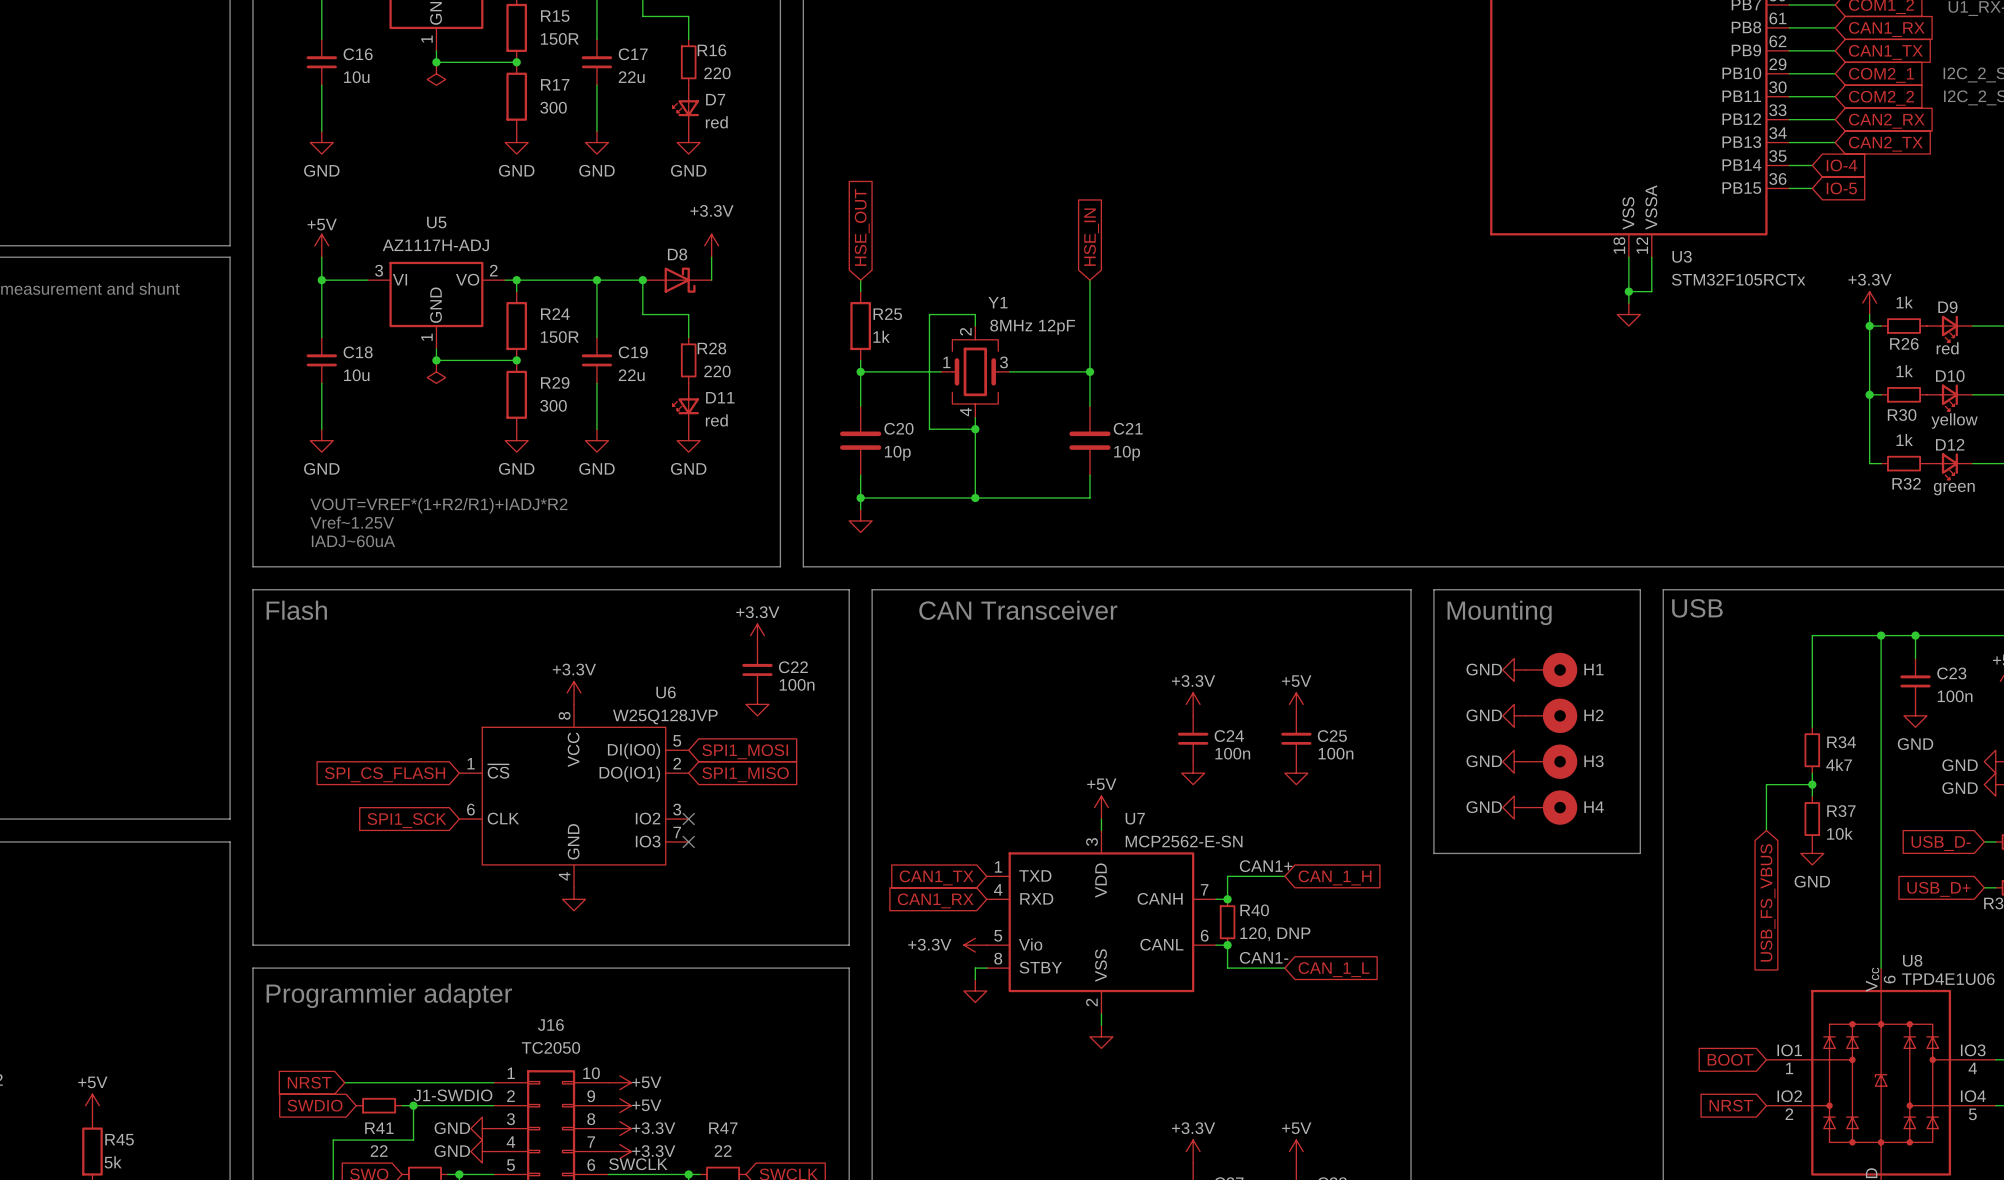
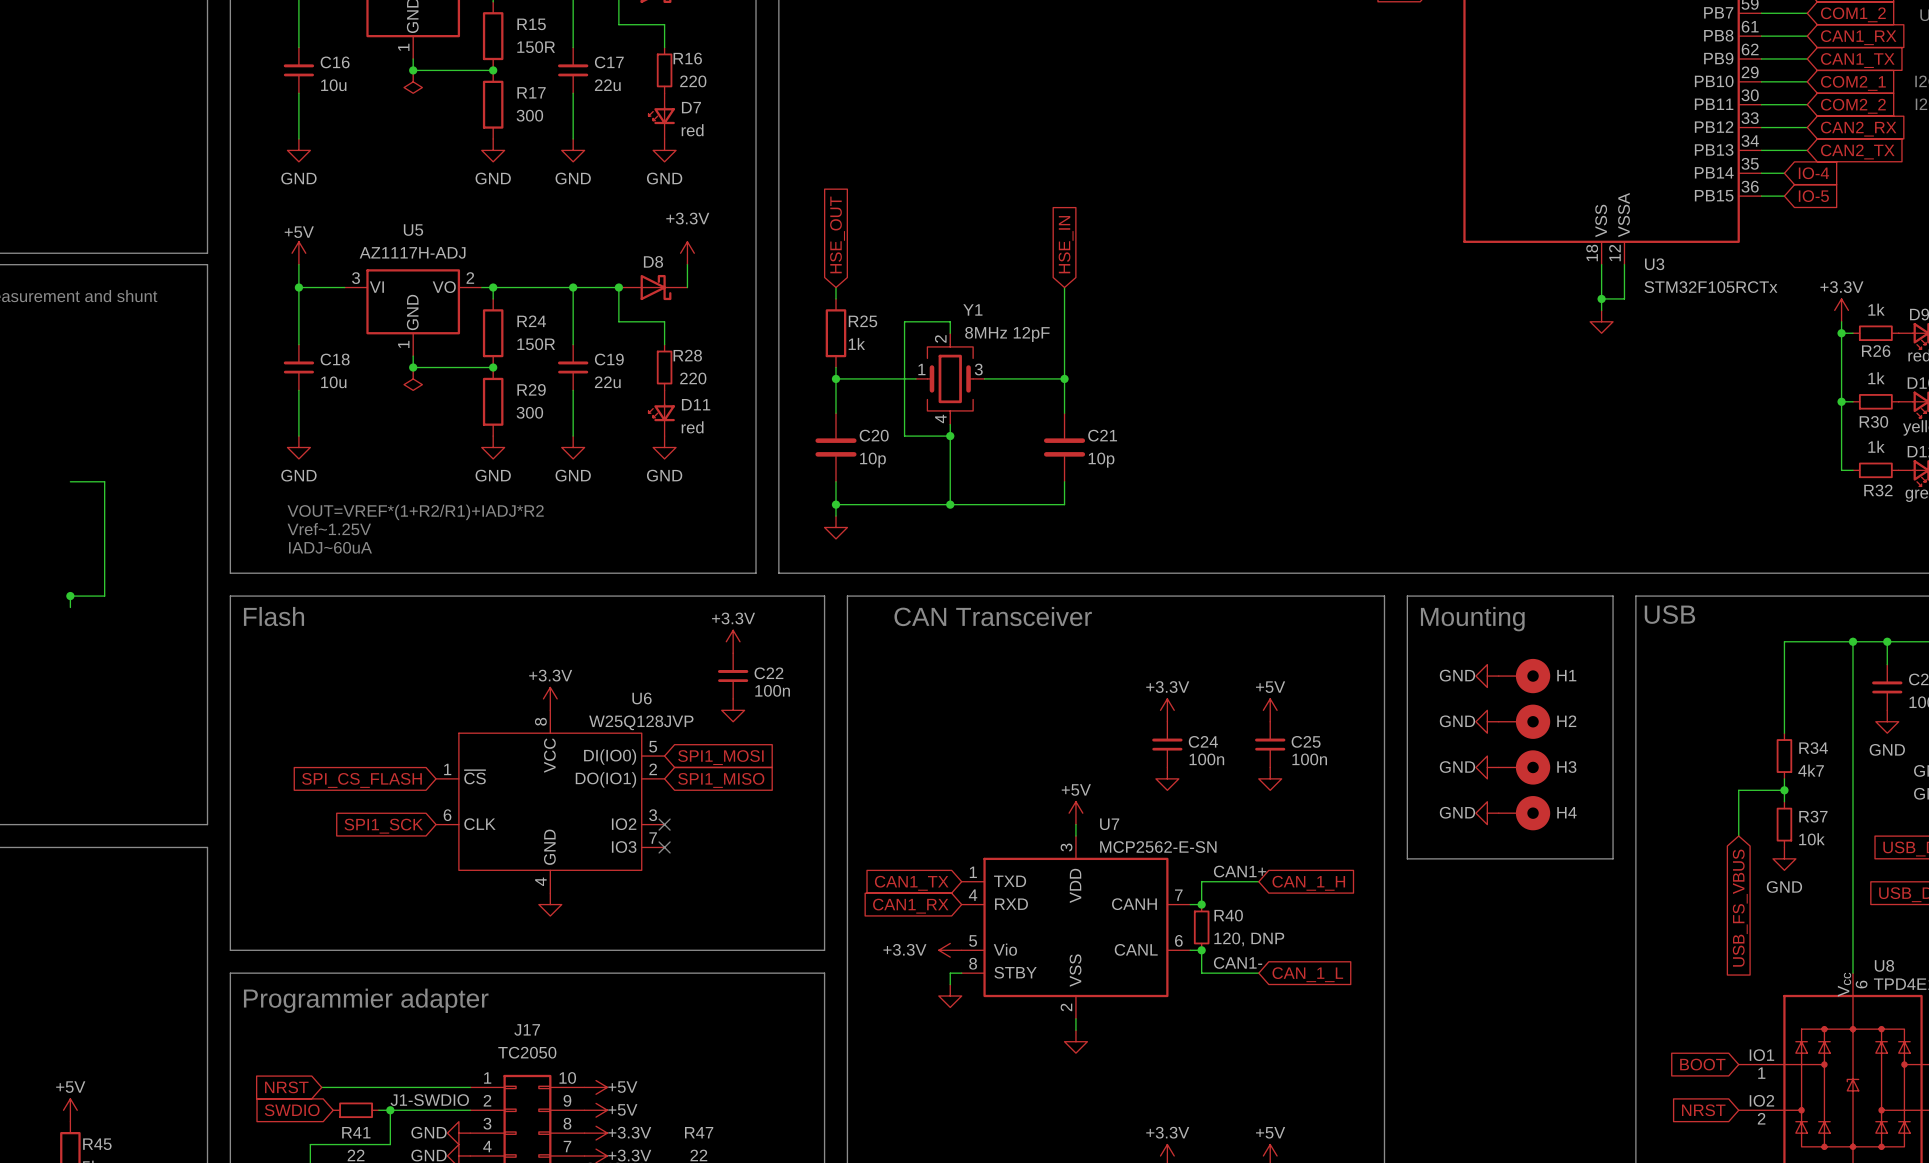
wire: none -> (70, 481) (104, 481) (104, 596) (70, 596) (70, 607)
junction: none -> (70, 596)
J16 name: J16 (550, 1024) -> J17 (527, 1029)

